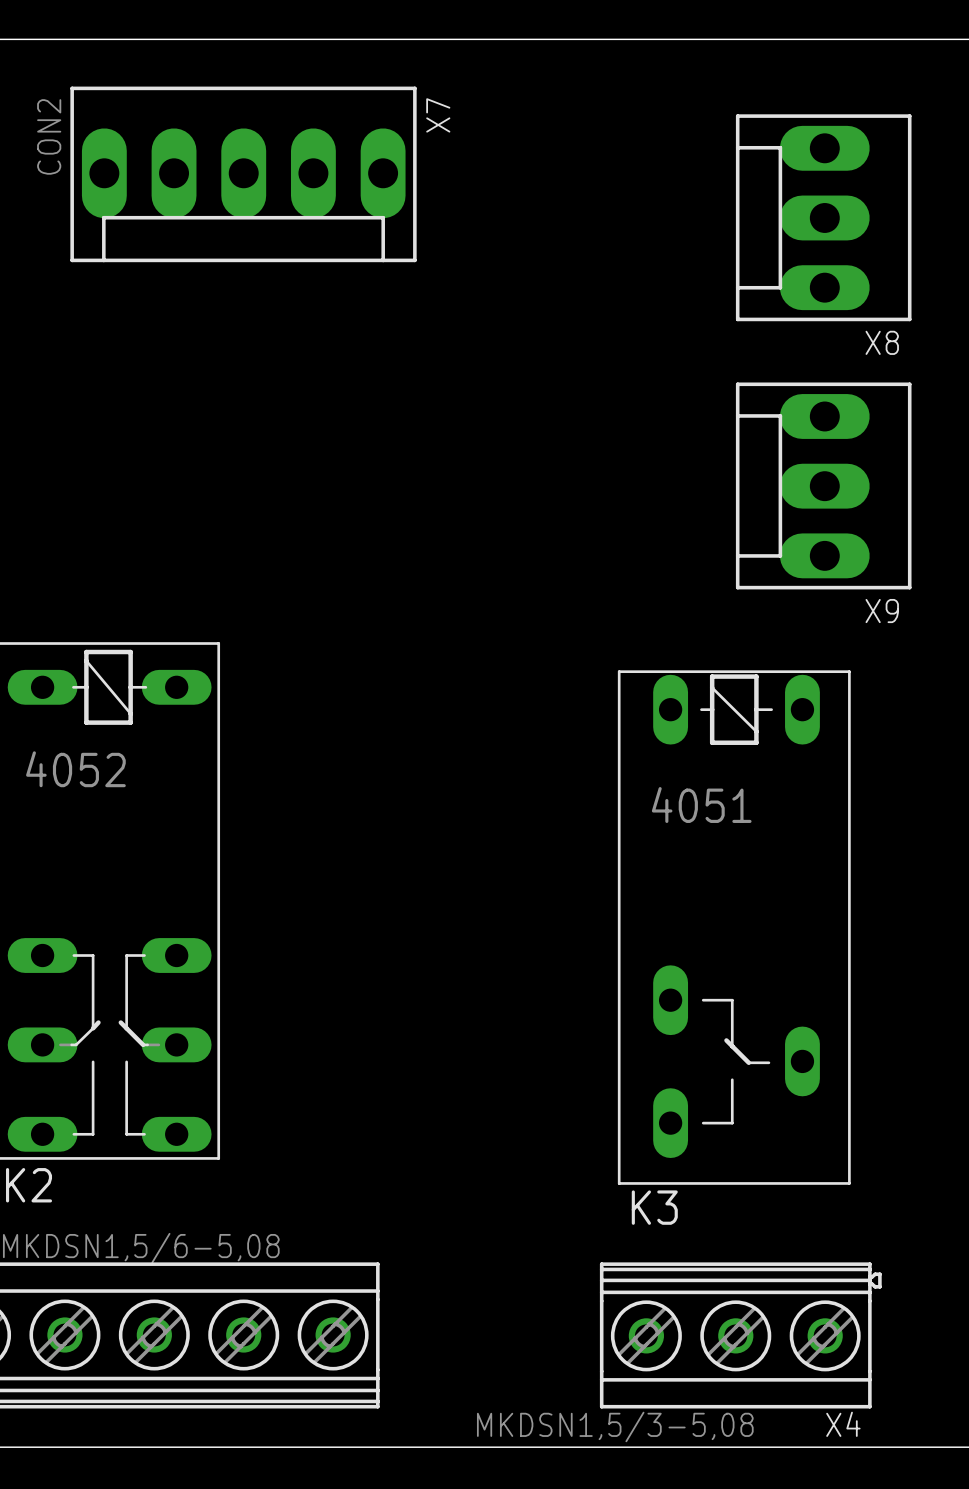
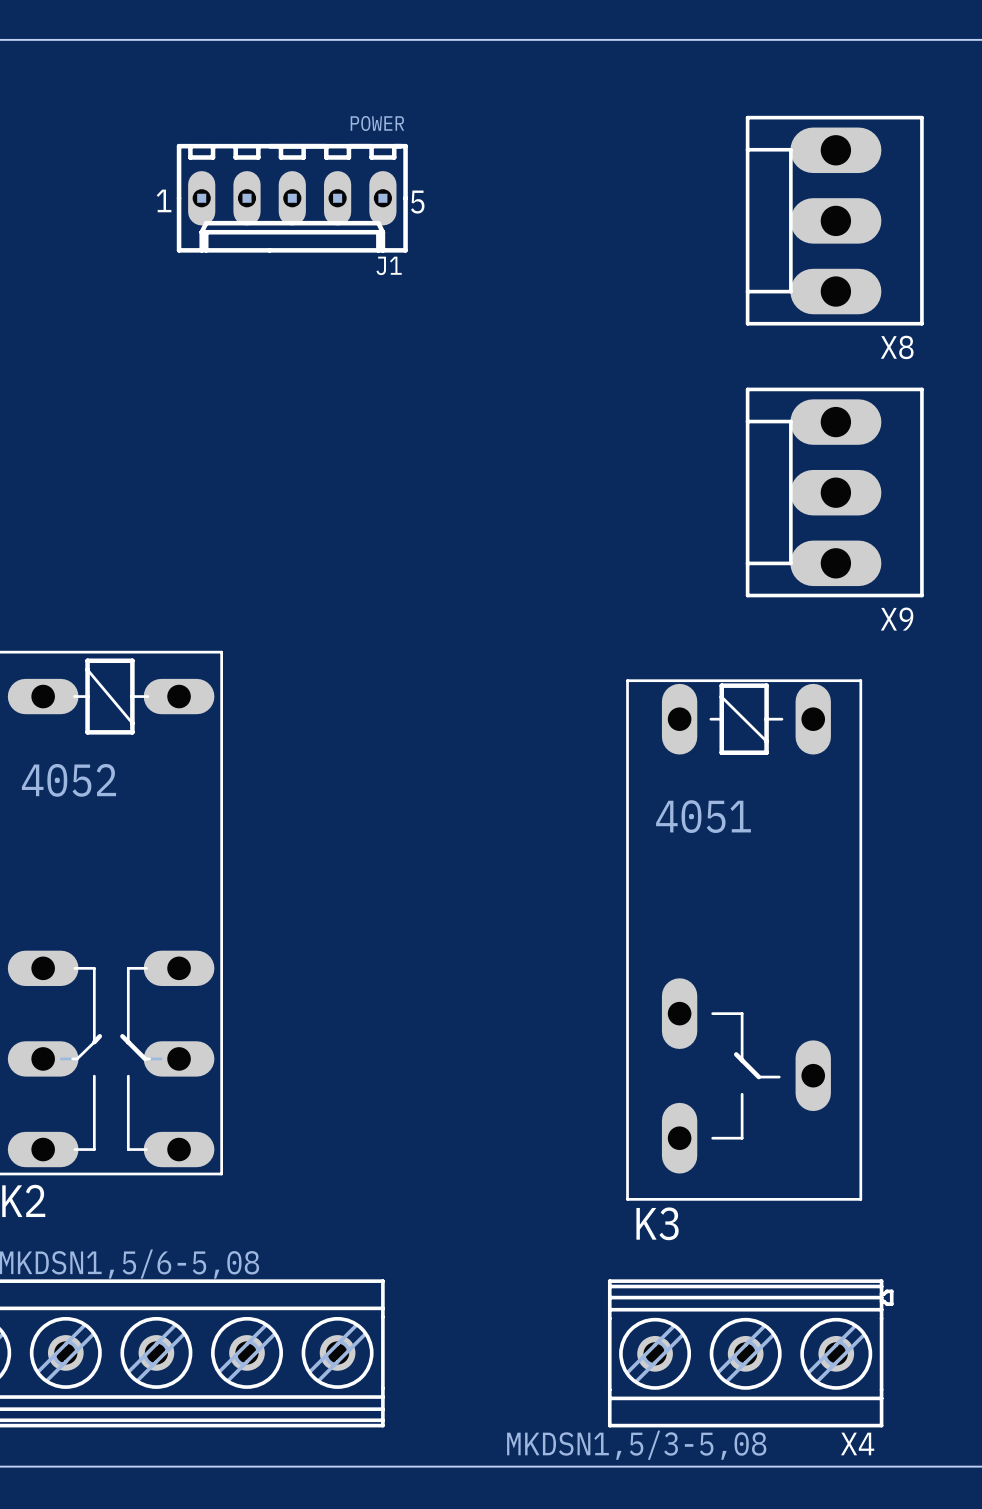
X7: CON2 (243, 174) -> none
J1: none -> POWER (292, 198)

